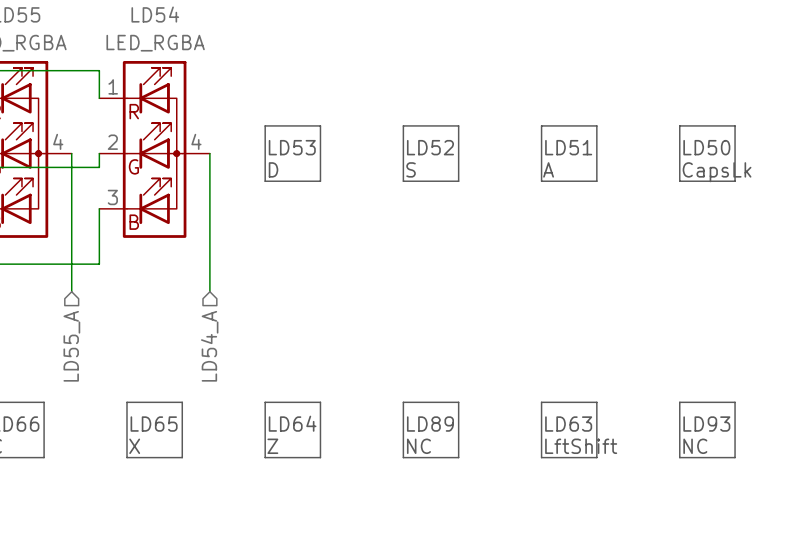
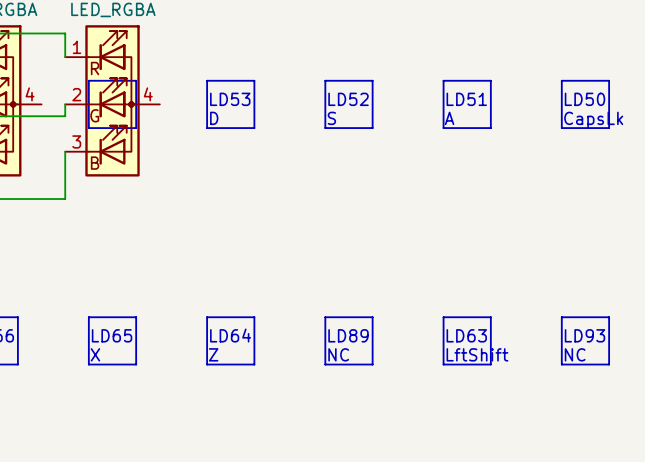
line: none -> (88, 80) (88, 128) (136, 128) (136, 80) (88, 80)
wire: (71, 153) (71, 291) -> none
wire: (209, 153) (209, 291) -> none
hierarchical label: LD55_A (71, 346) -> none
hierarchical label: LD54_A (209, 346) -> none

